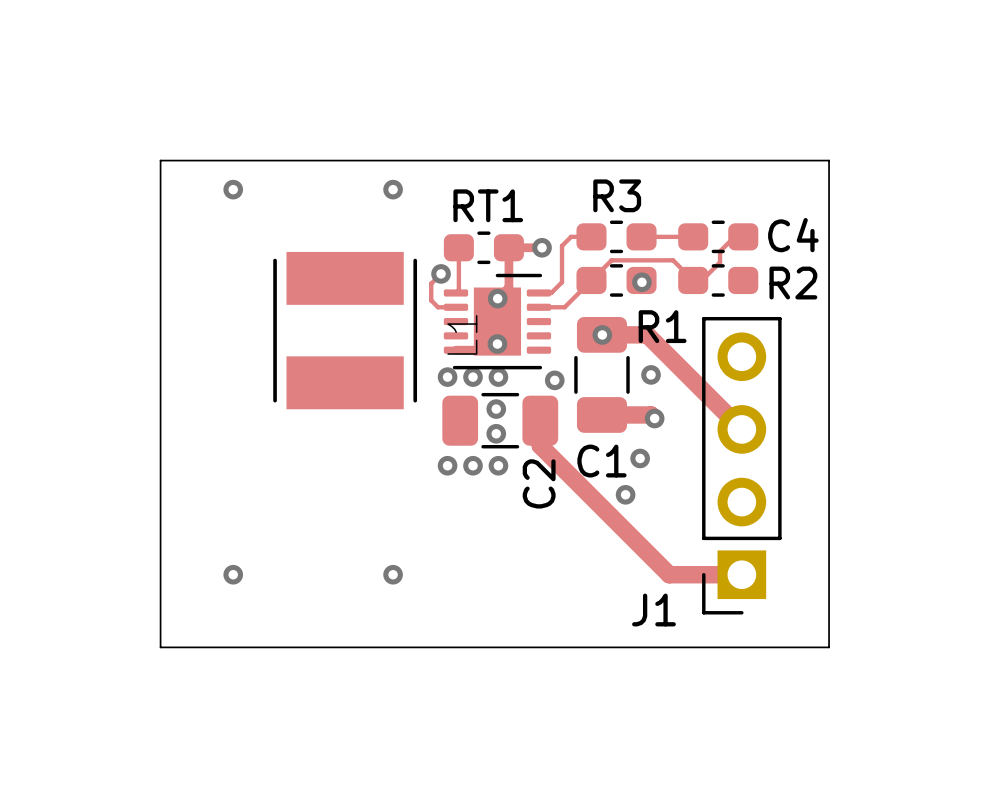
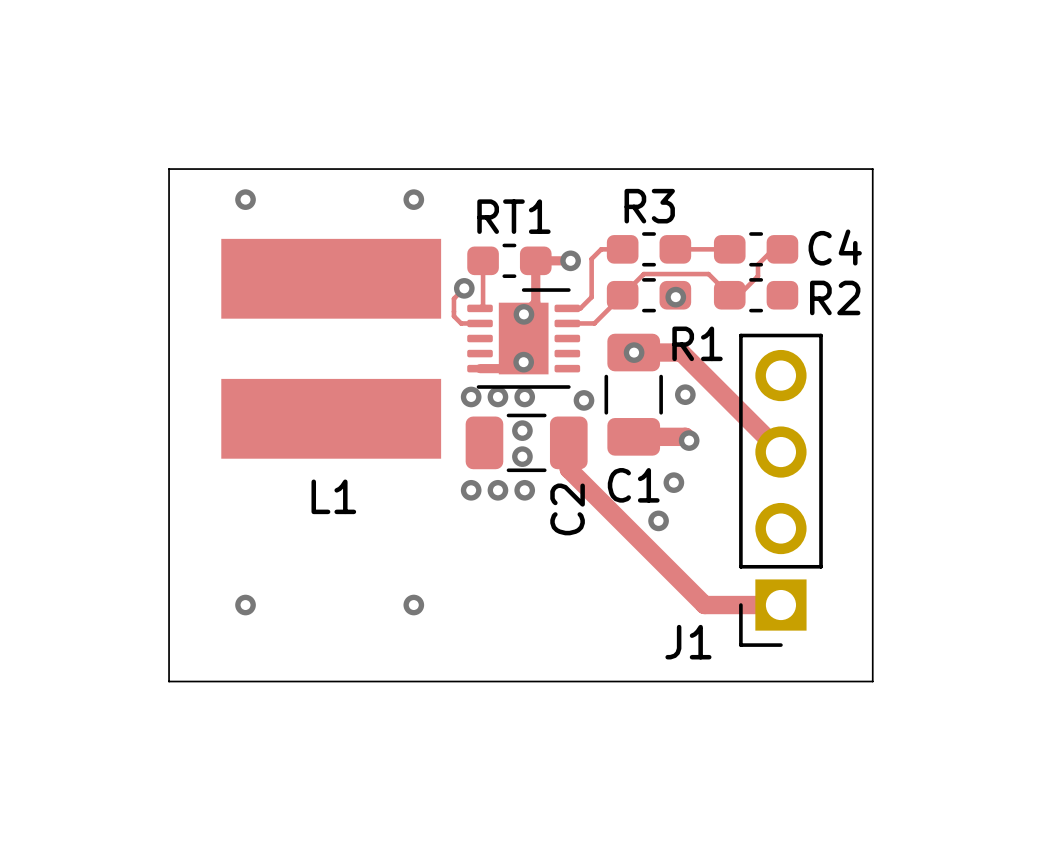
L1 footprint: [273, 251, 418, 410] -> [221, 238, 442, 459]
L1 name position: L1 (462, 334) -> L1 (333, 496)

